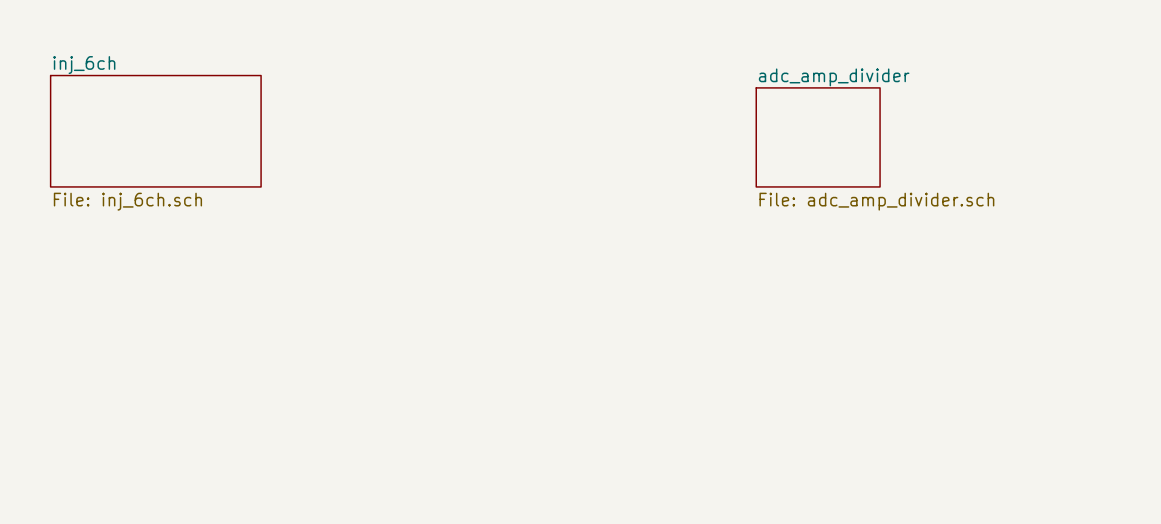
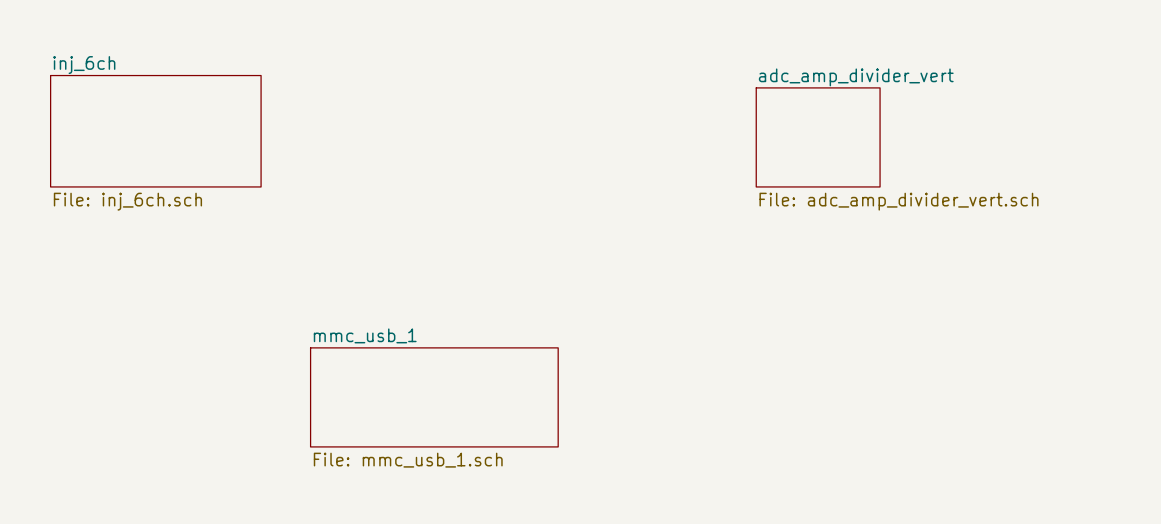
sheet adc_amp_divider name: adc_amp_divider (834, 77) -> adc_amp_divider_vert (856, 77)
sheet adc_amp_divider value: File: adc_amp_divider.sch (876, 201) -> File: adc_amp_divider_vert.sch (899, 201)
sheet mmc_usb_1: none -> File: mmc_usb_1.sch (434, 397)

